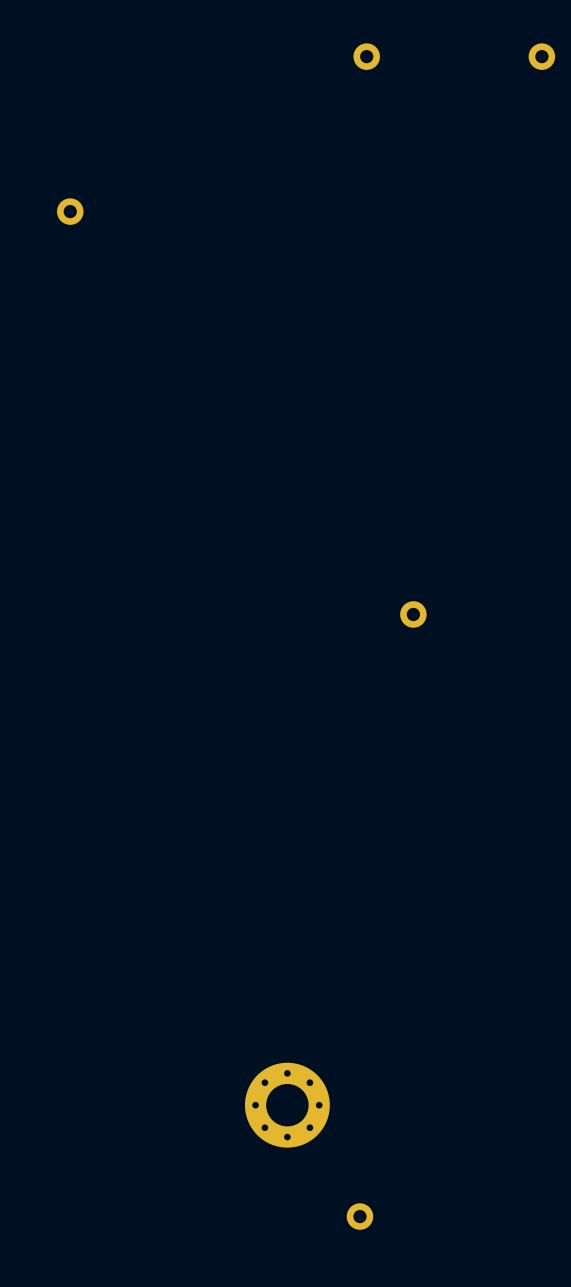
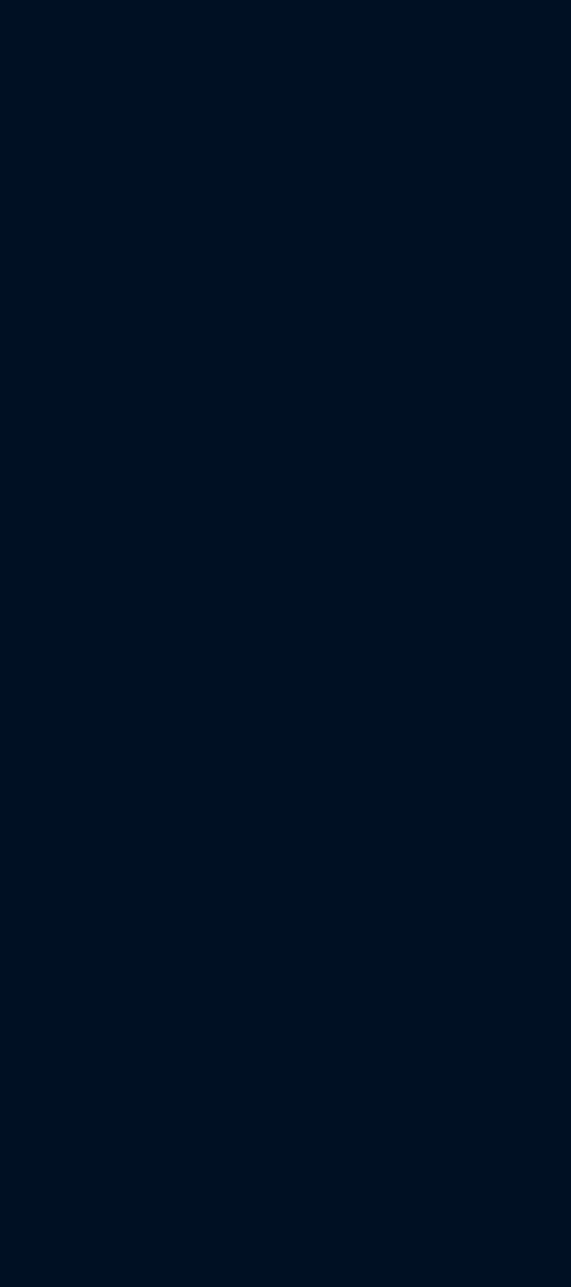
part: (366, 56) -> none
part: (541, 56) -> none
part: (70, 211) -> none
part: (413, 614) -> none
part: (287, 1105) -> none
part: (359, 1216) -> none

